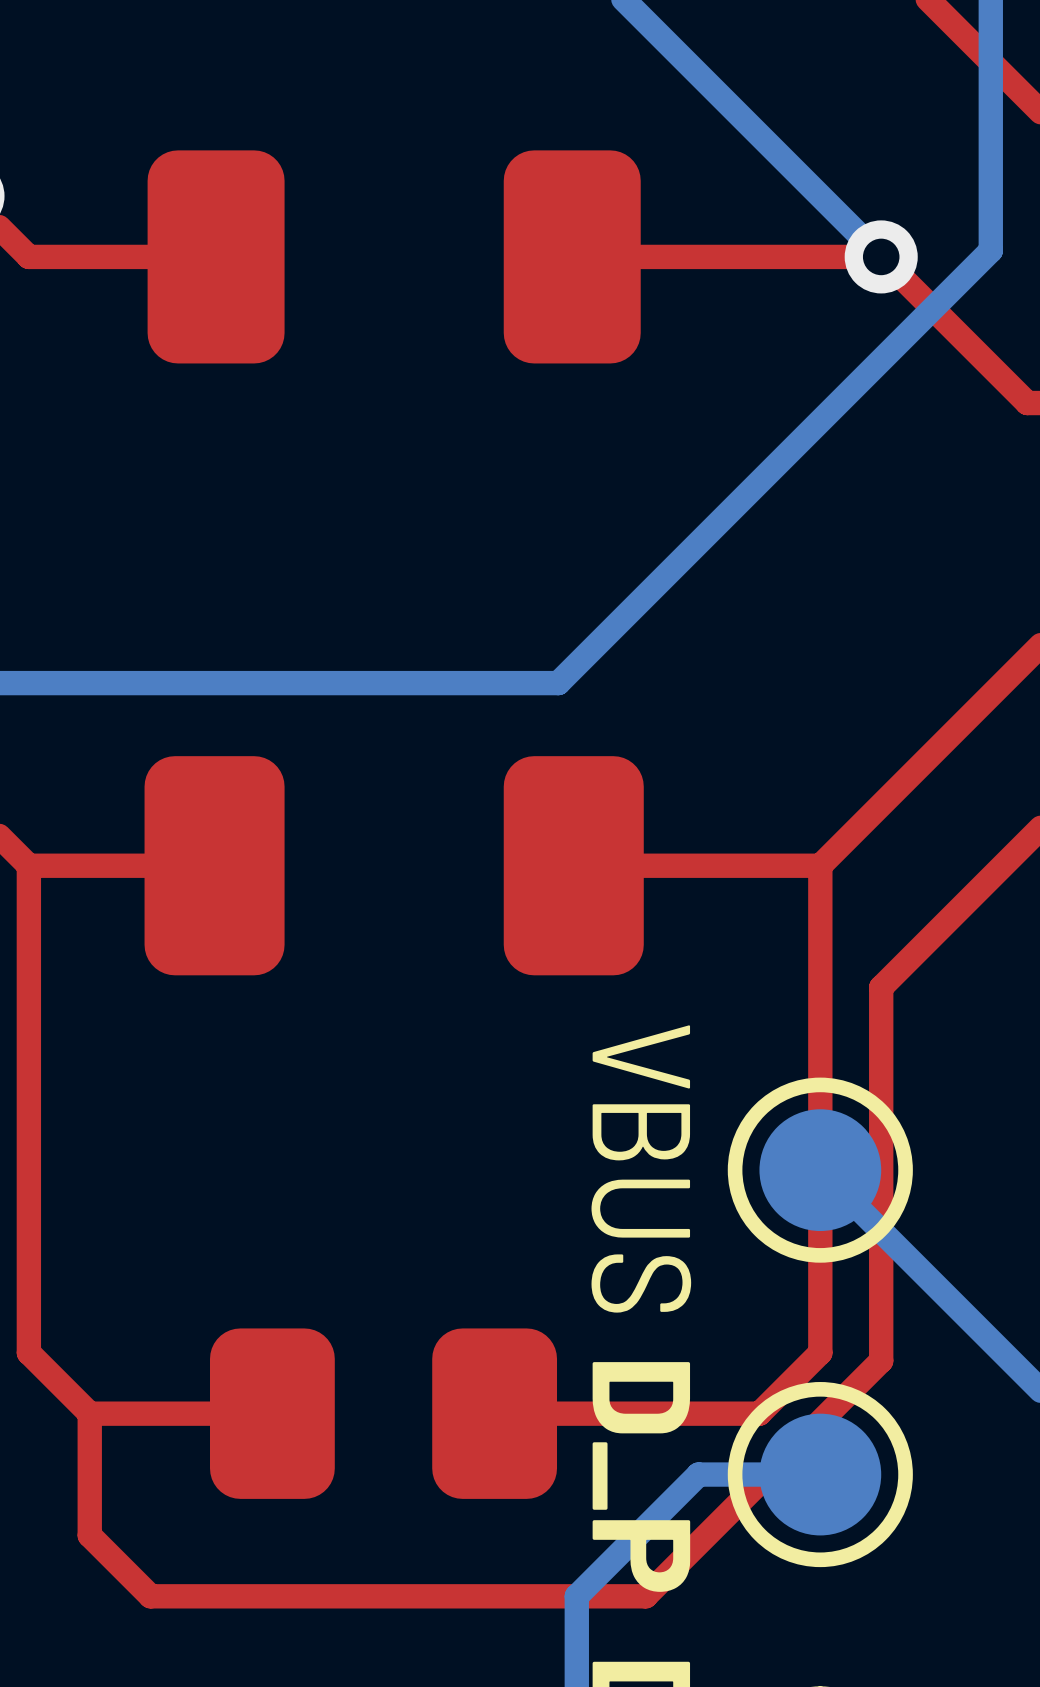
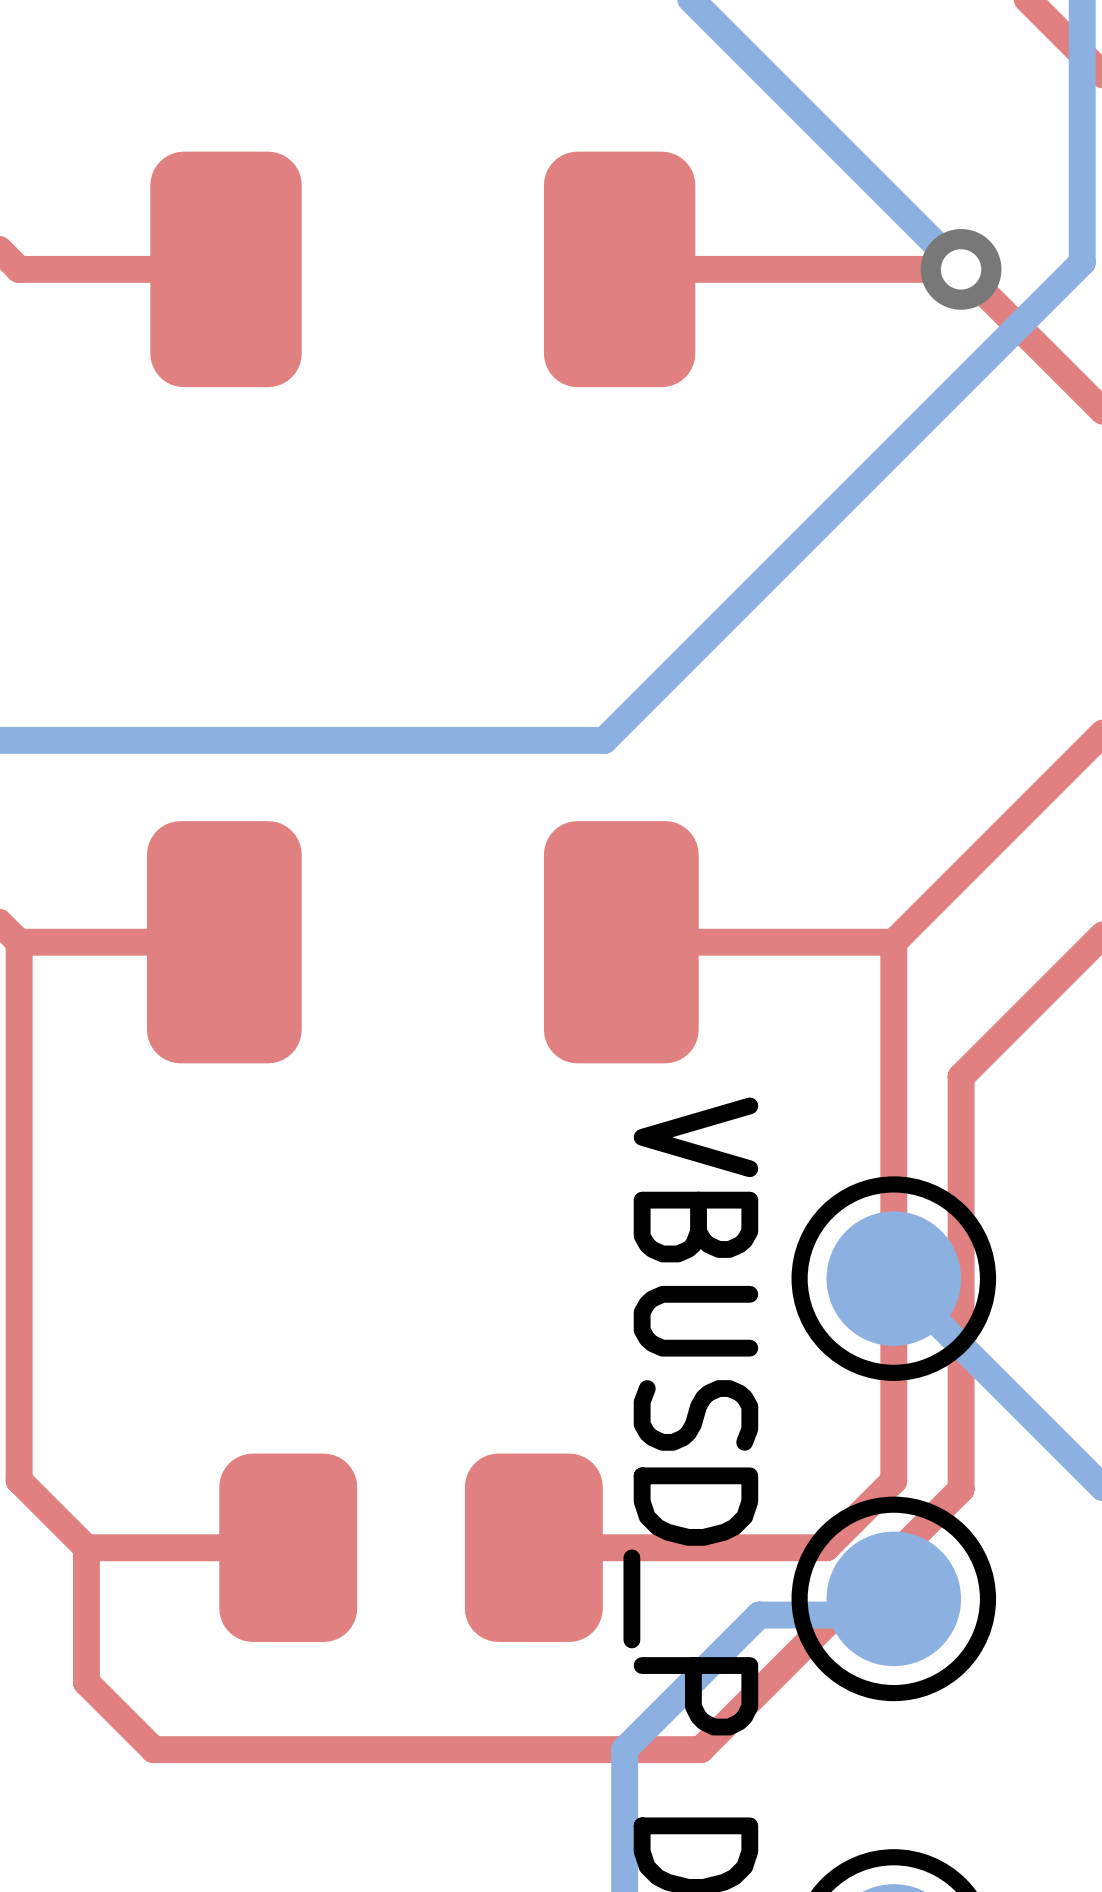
part position: (820, 1474) -> (893, 1598)

